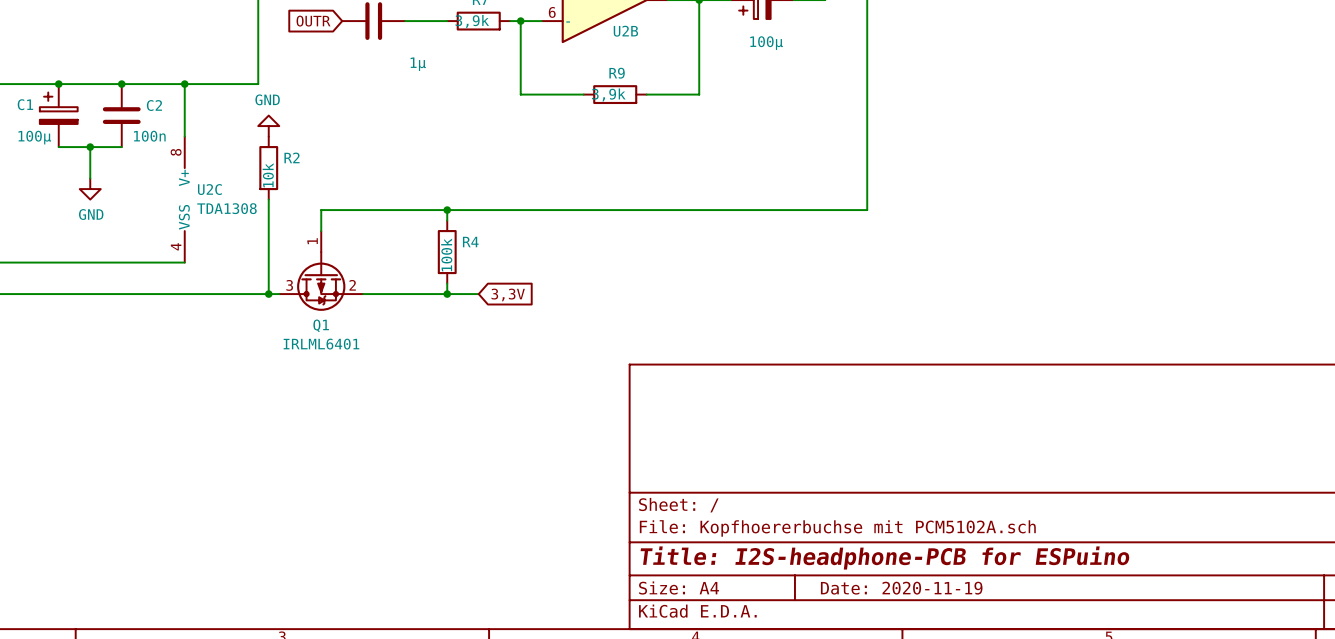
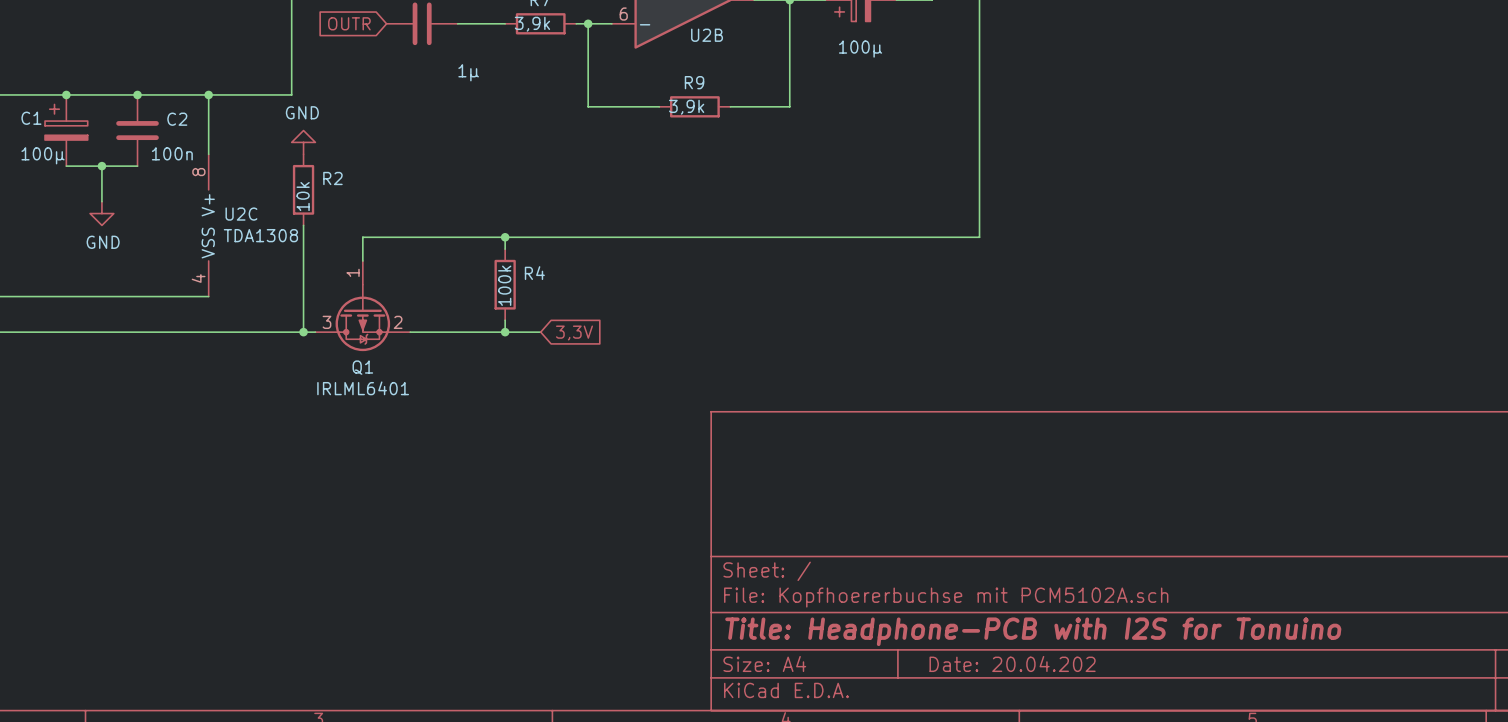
title block: Title: I2S-headphone-PCB for ESPuino (885, 557) -> Title: Headphone-PCB with I2S for Tonuino (1033, 631)
title block: Date: 2020-11-19 (901, 588) -> Date: 20.04.202 (1012, 663)

